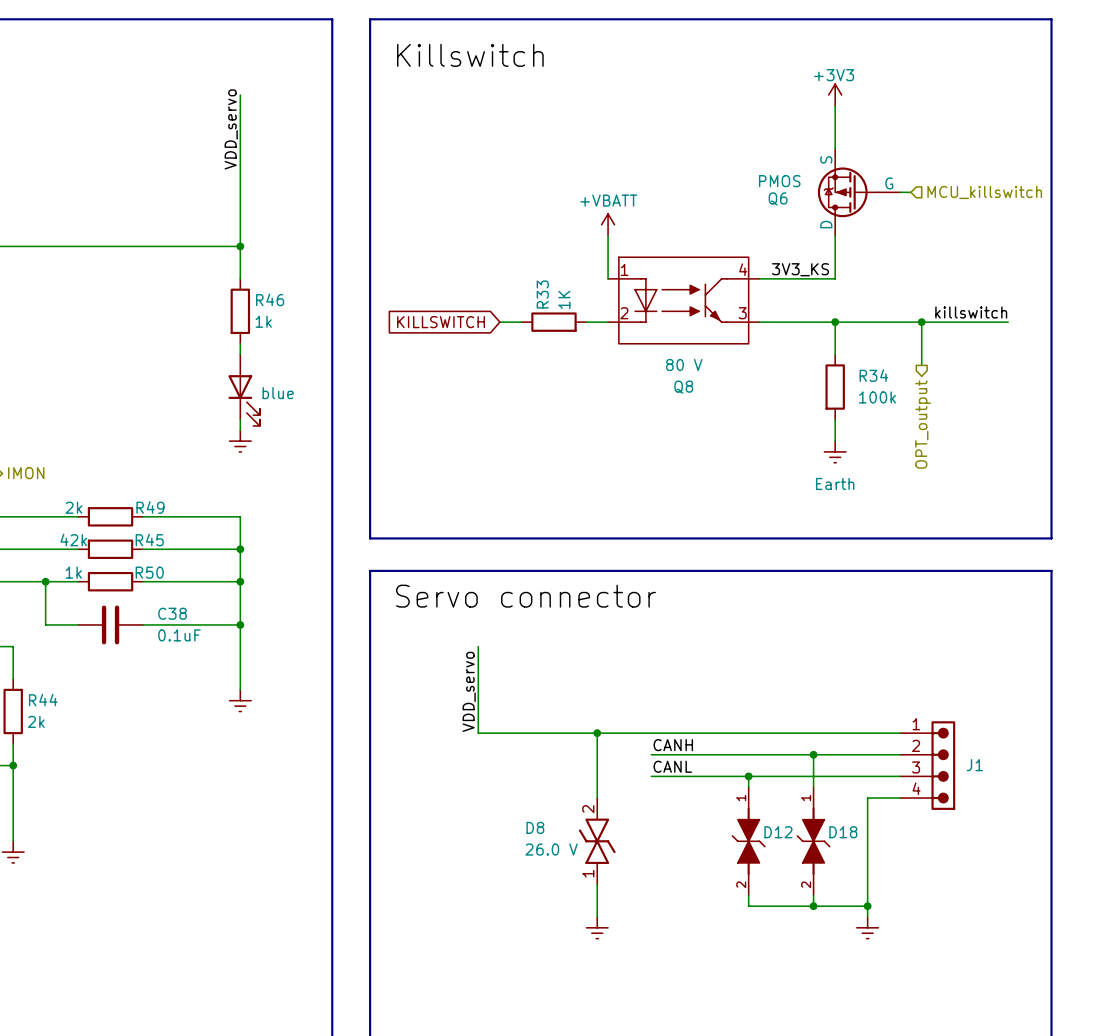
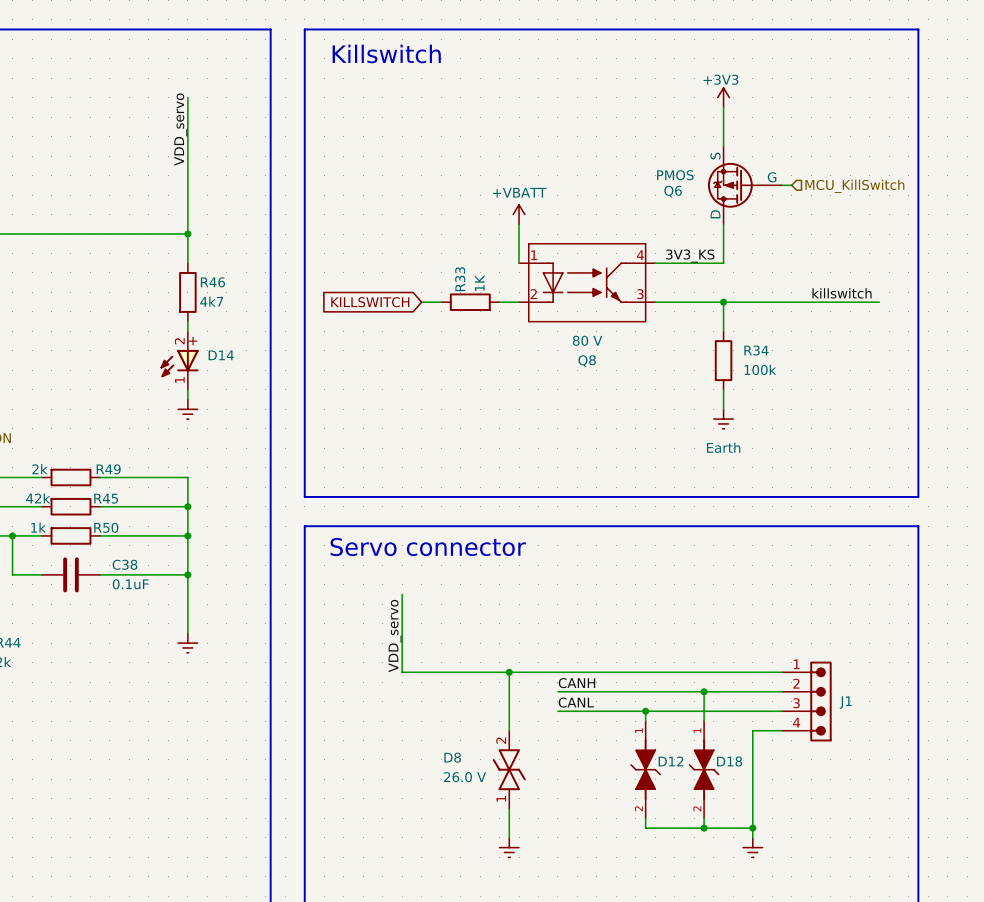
text: none -> Killswitch (386, 53)
label: Killswitch (470, 55) -> none
hierarchical label: MCU_killswitch (984, 192) -> MCU_KillSwitch (854, 186)
R46 value: 1k (263, 321) -> 4k7 (211, 301)
wire: (921, 322) (921, 365) -> none
junction: (921, 322) -> none
D14: none -> (179, 360)
part: blue (244, 390) -> none
hierarchical label: OPT_output (923, 424) -> none
text: none -> Servo connector (428, 547)
label: Servo connector (525, 596) -> none

